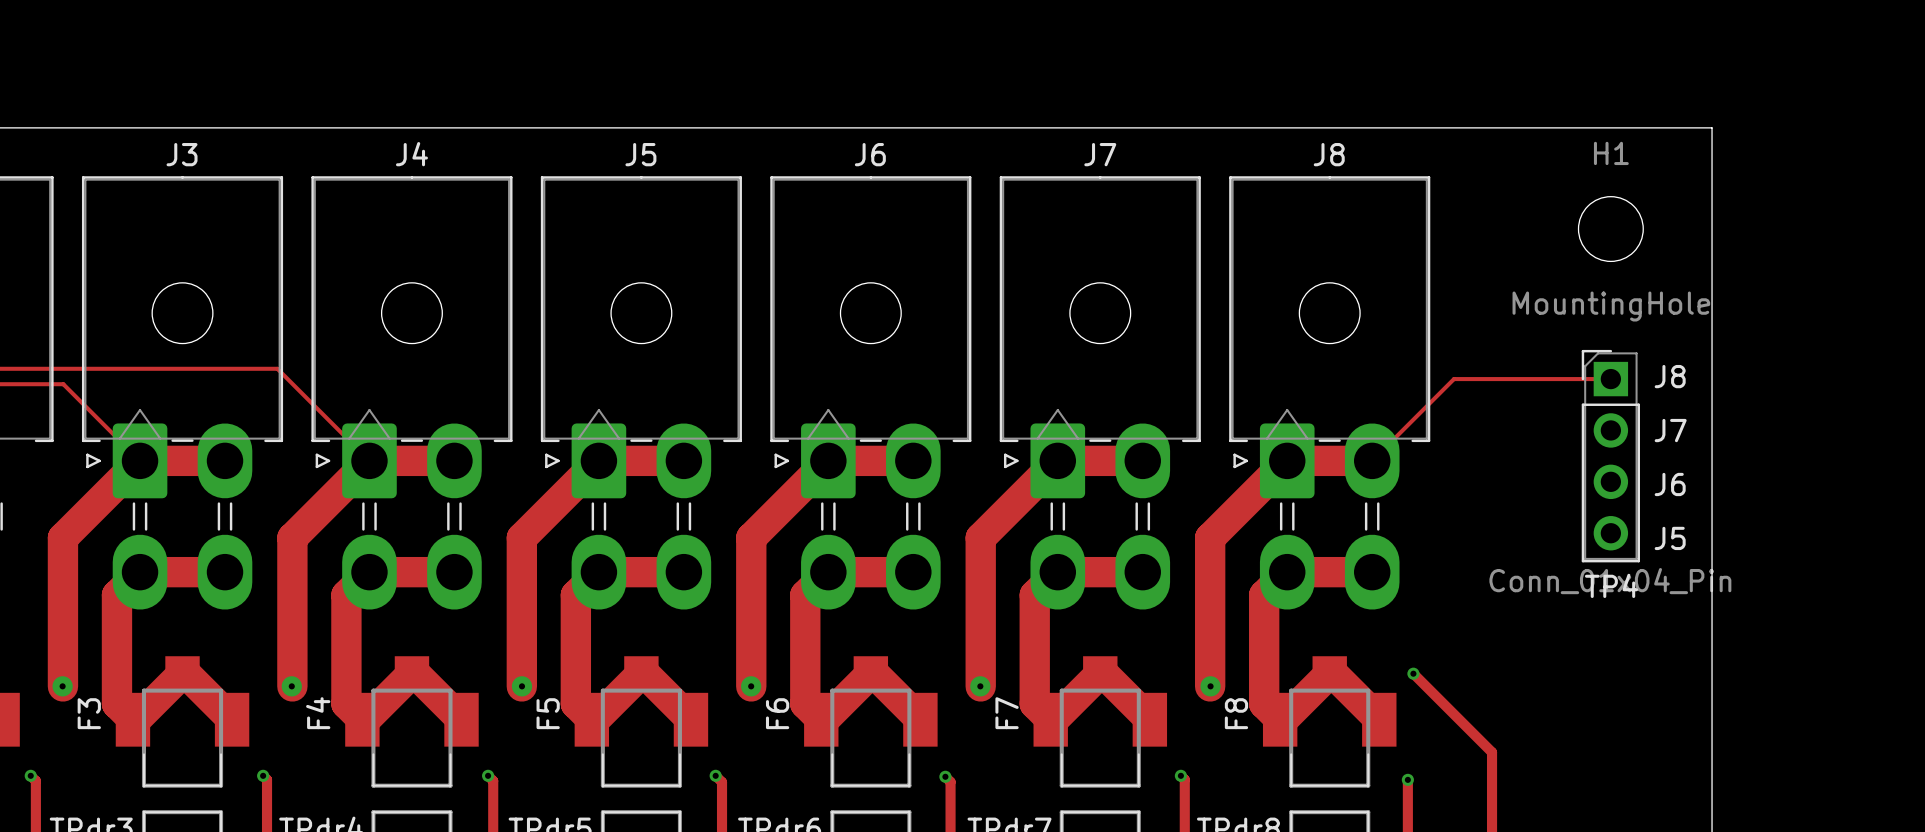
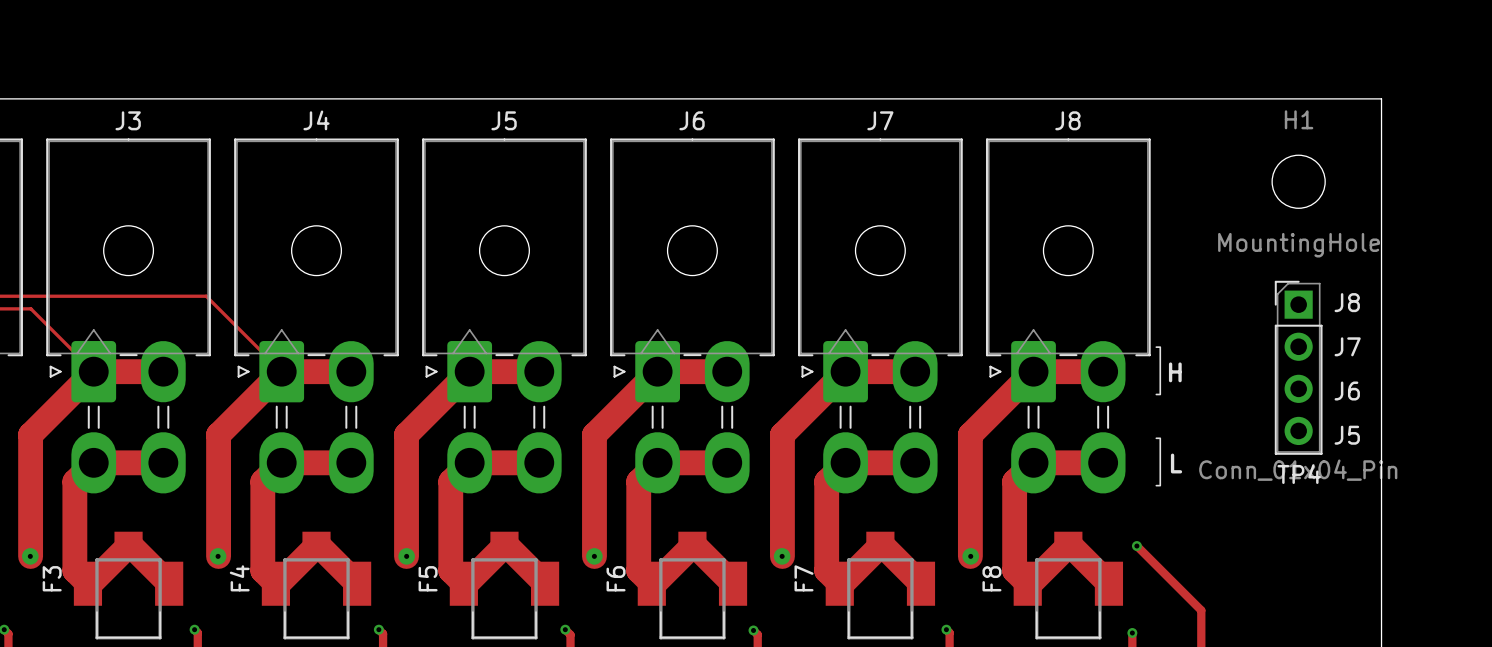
track: (1610, 379) (1454, 379) (1372, 460) -> none
J8 text: none -> ] (1158, 370)
J8 text: none -> H (1175, 372)
J8 text: none -> ] (1158, 461)
J8 text: none -> L (1176, 463)

